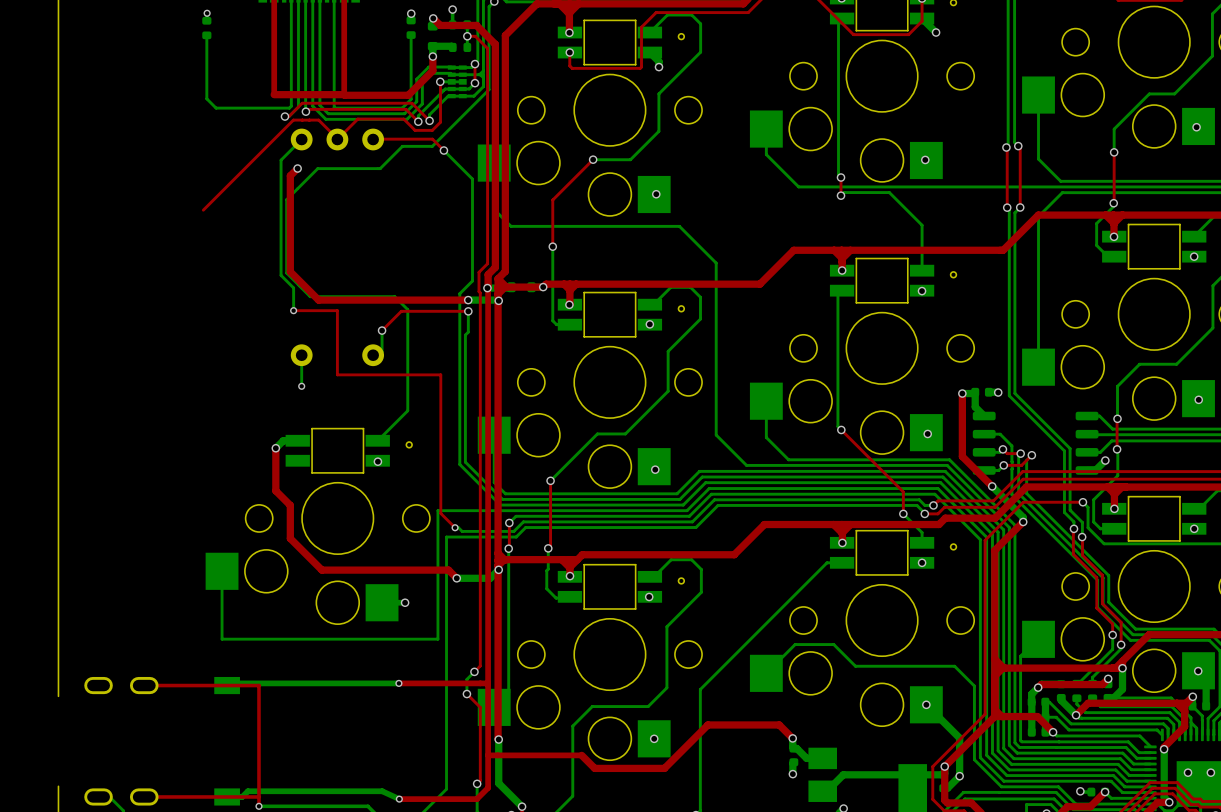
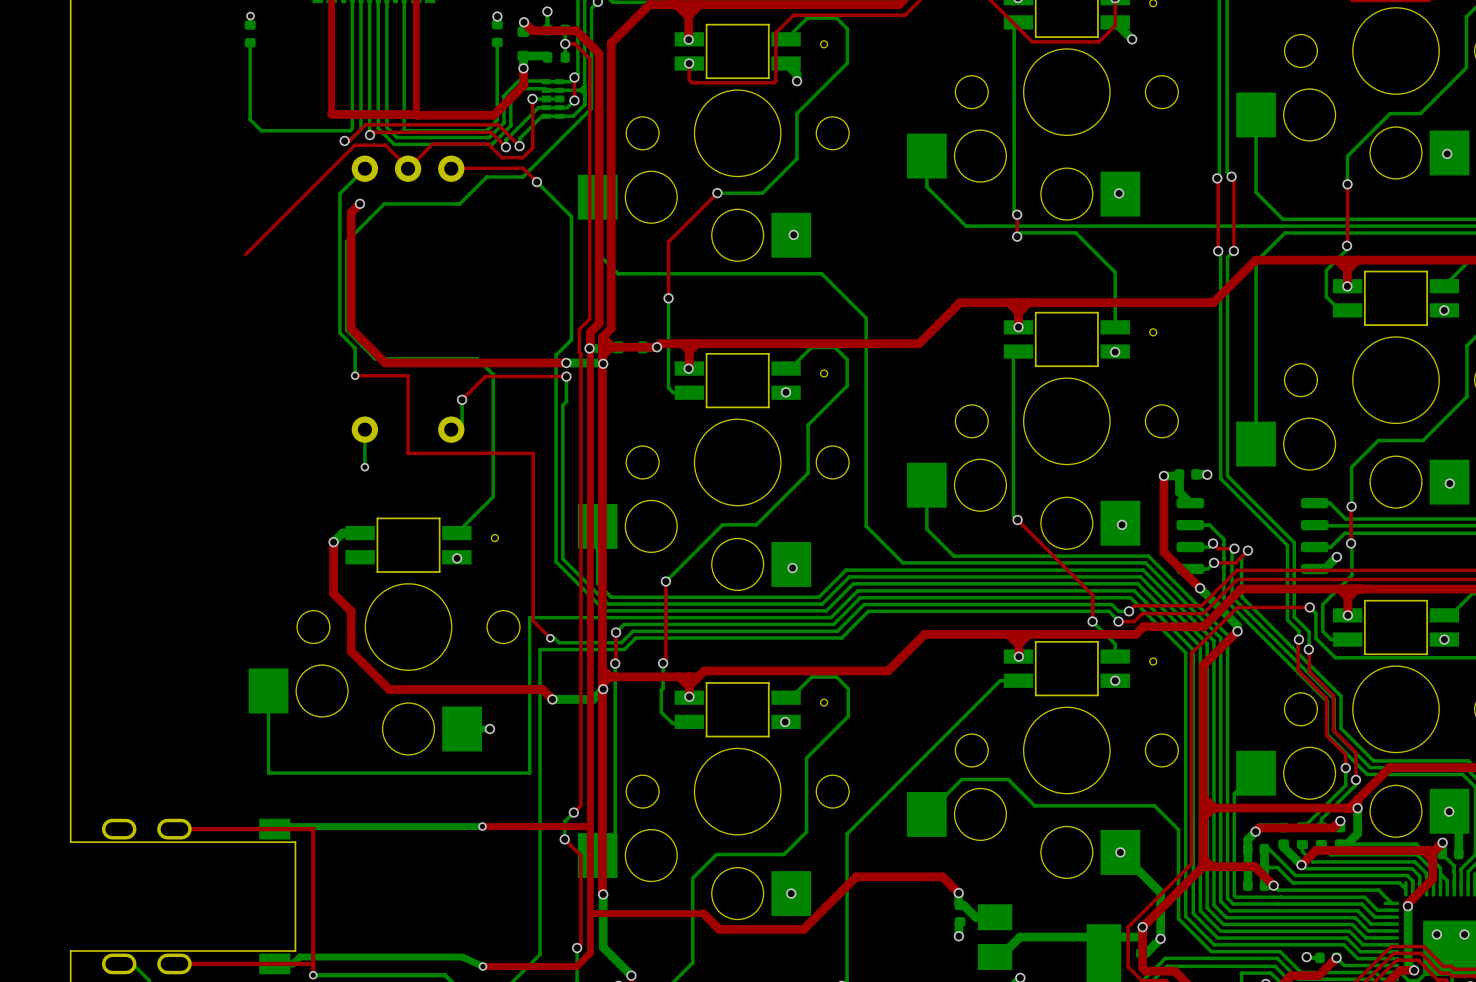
board edge: none -> (70, 842) (295, 842) (295, 951) (70, 951)

